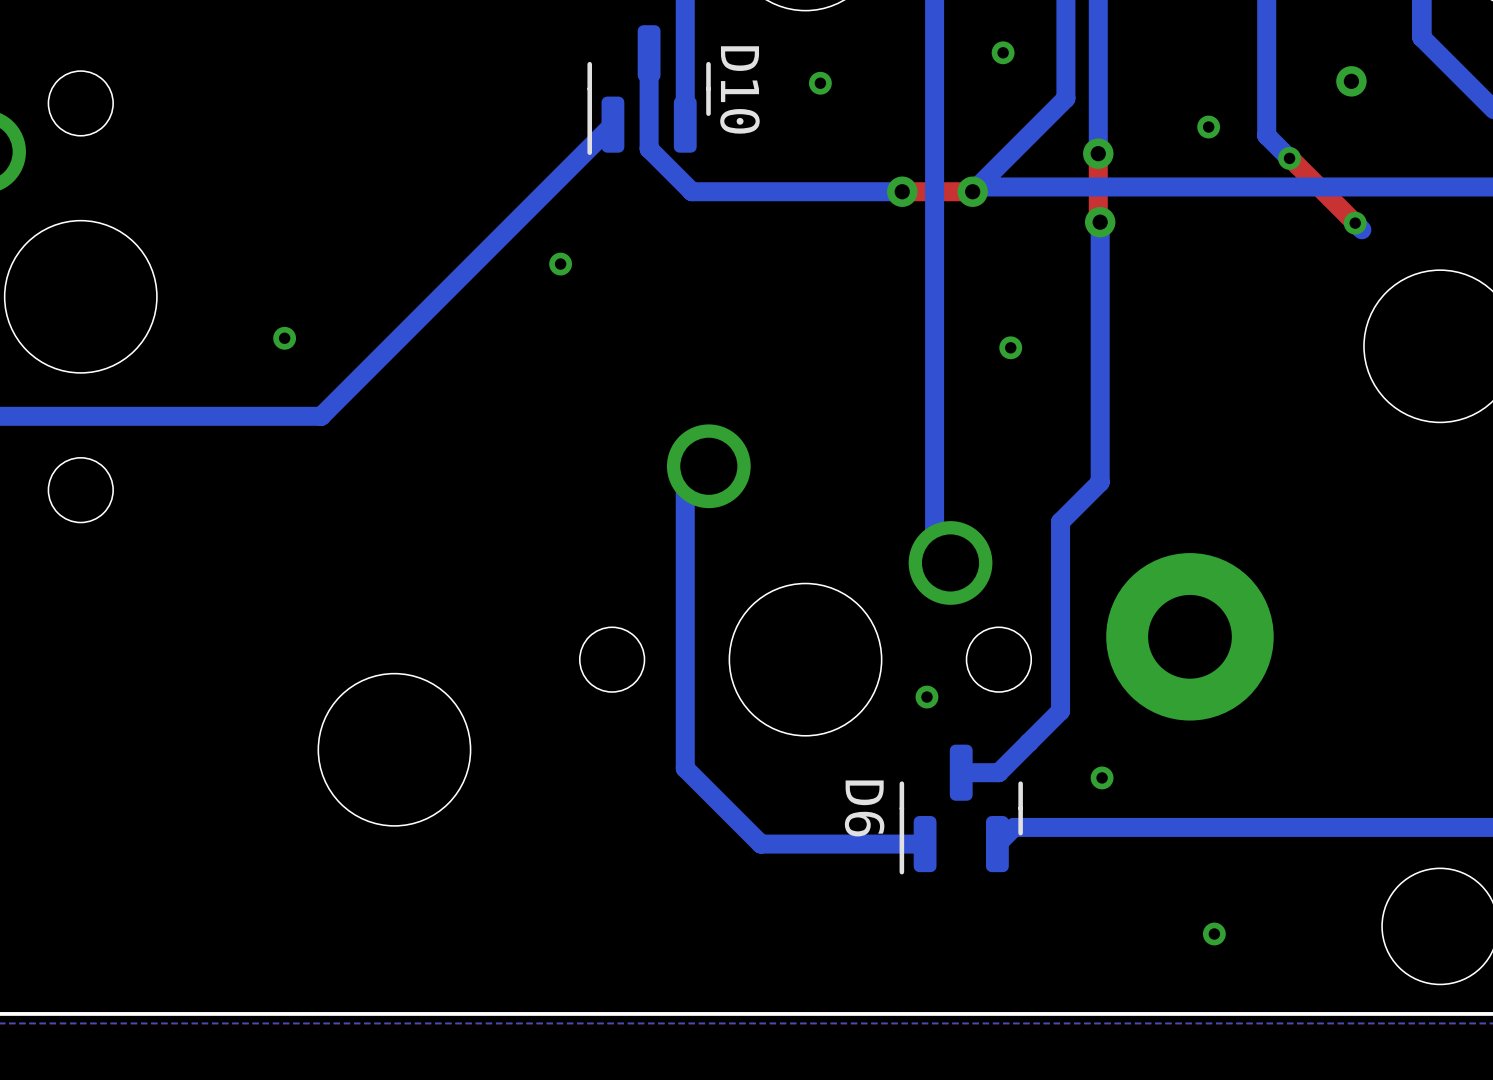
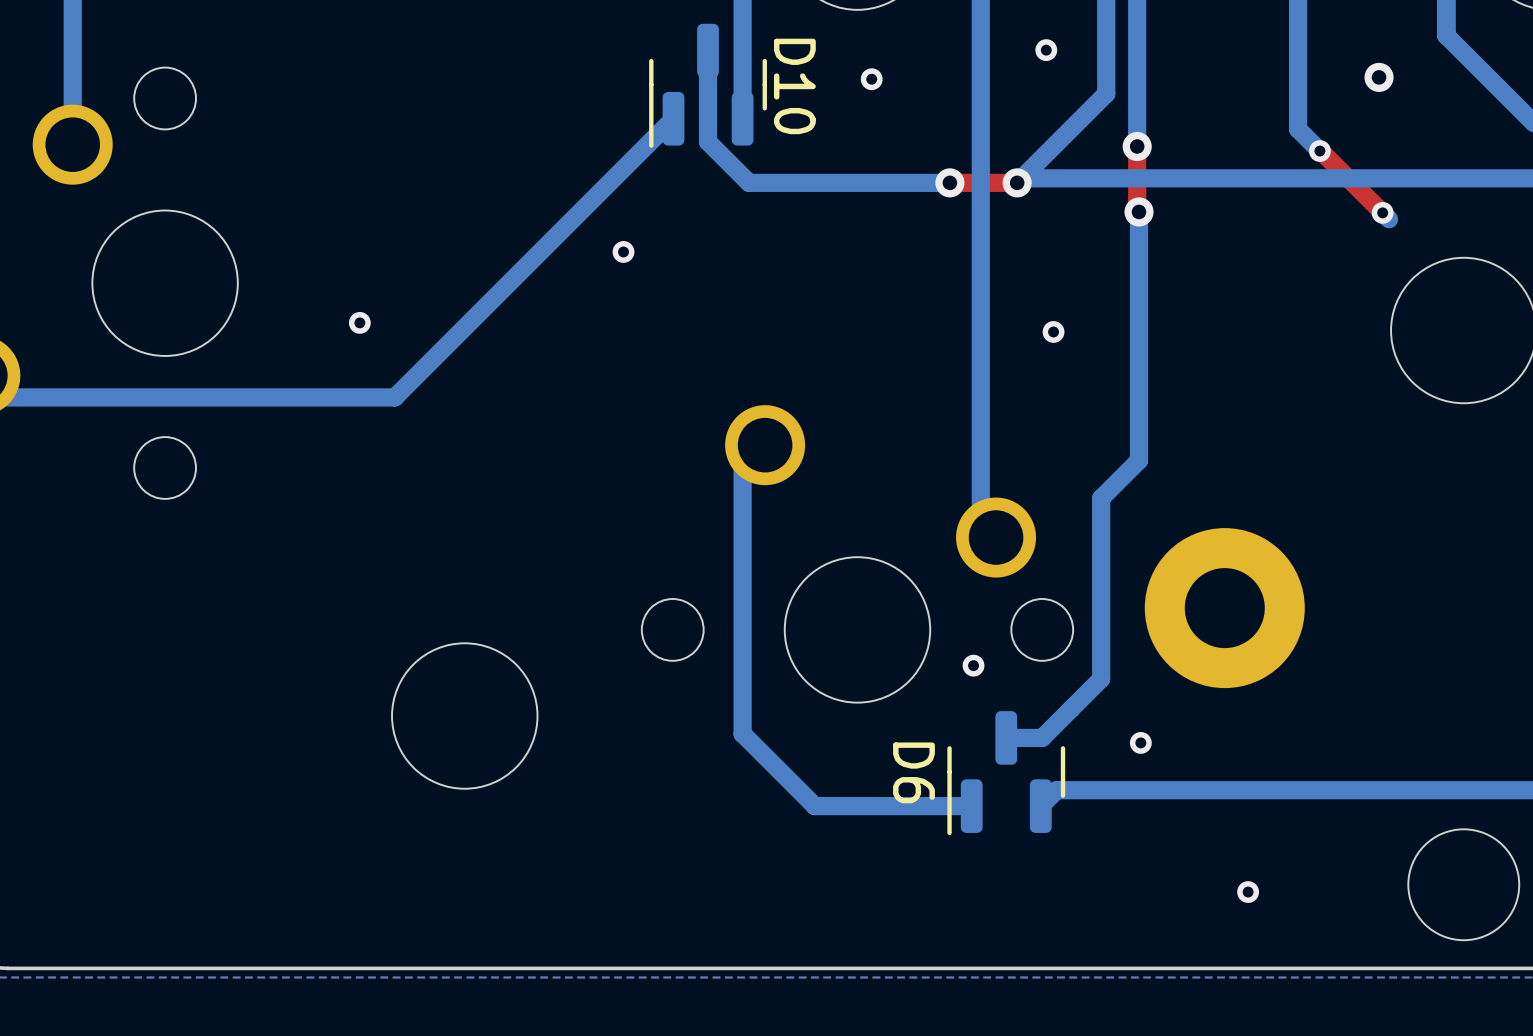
via: (1208, 127) -> none

